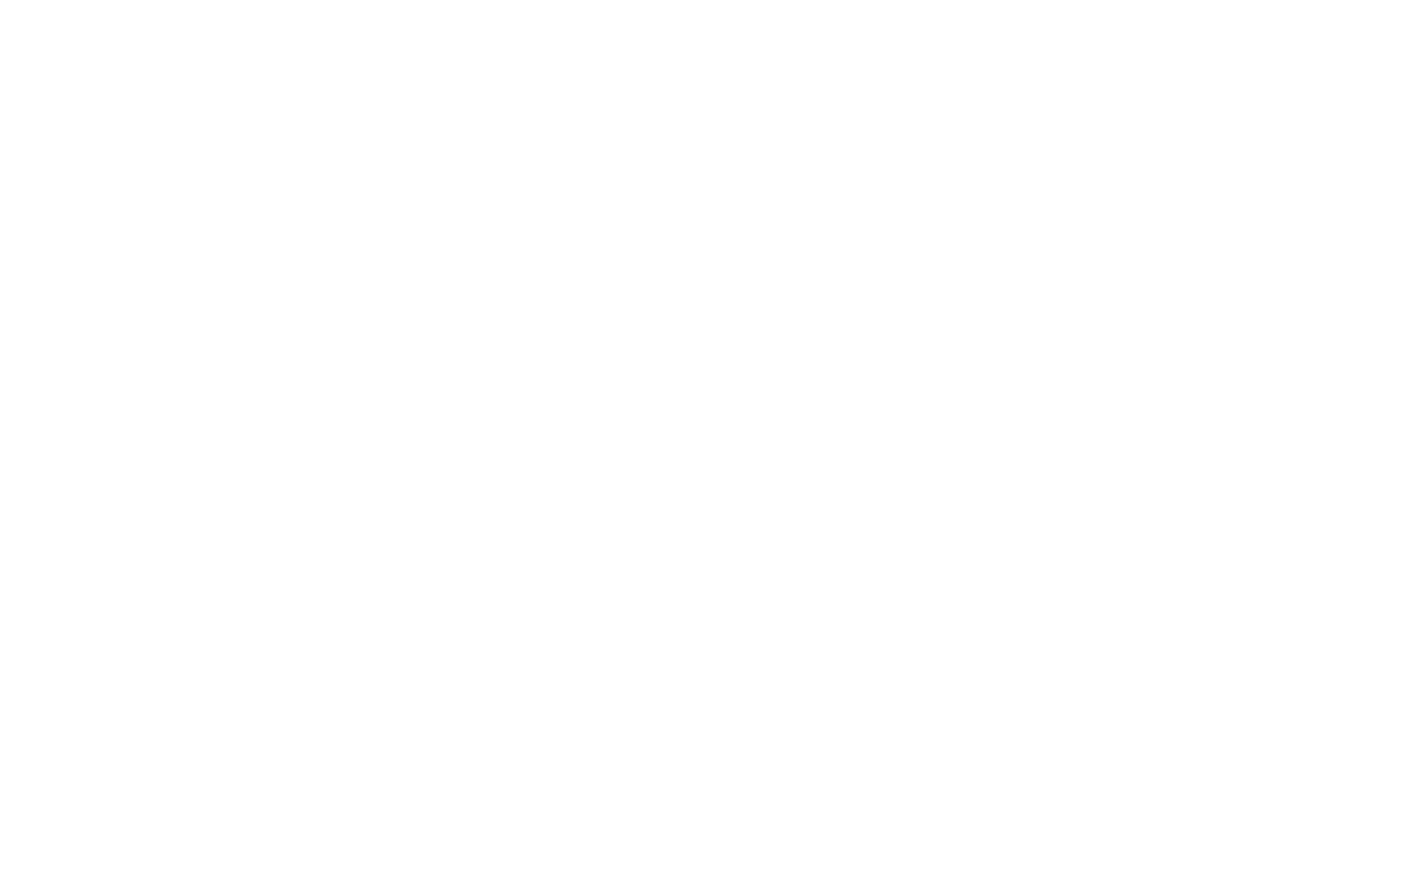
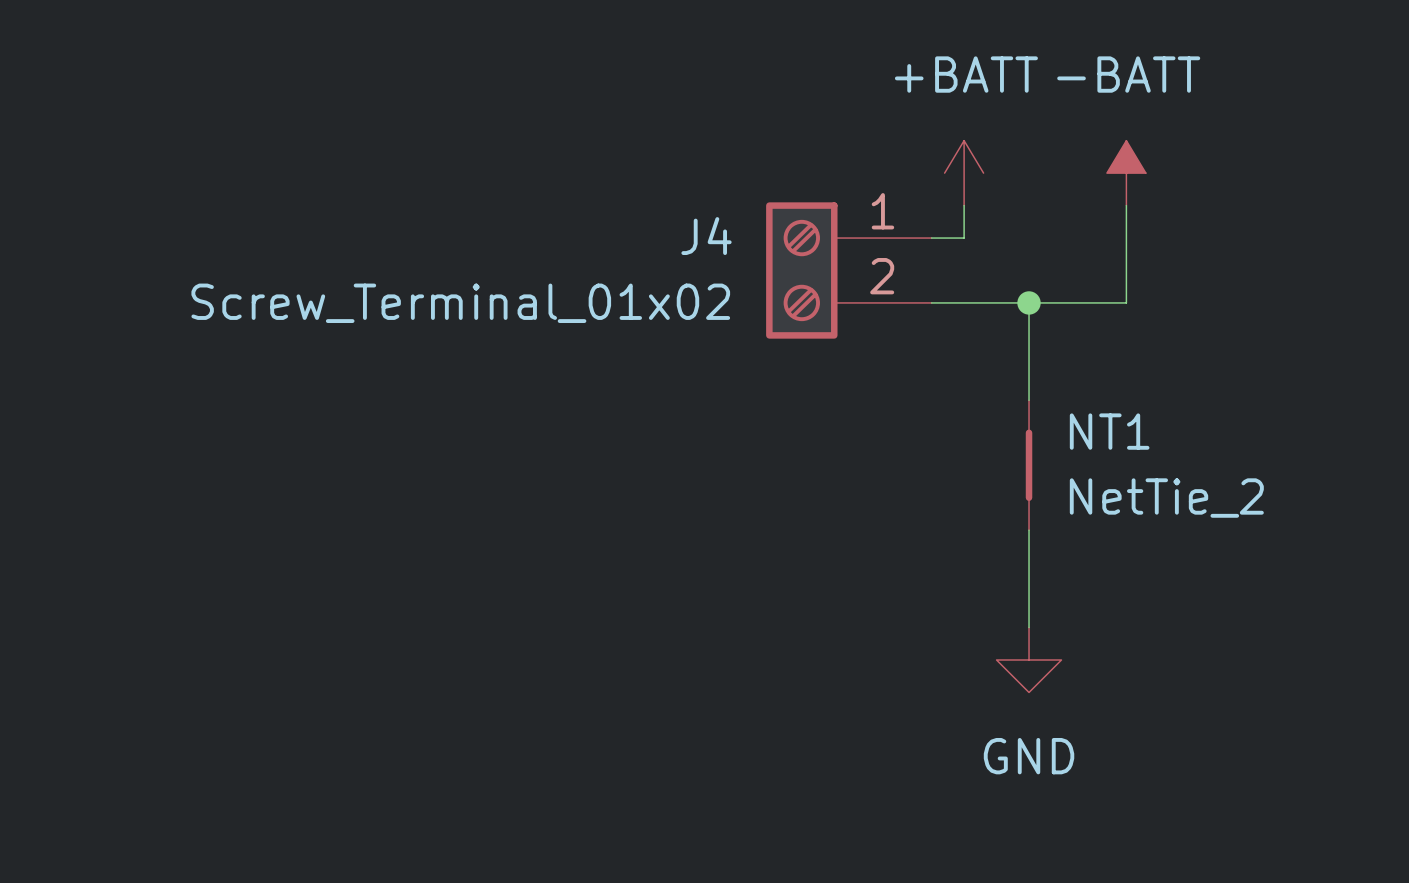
power symbol: none -> +BATT (964, 173)
power symbol: none -> -BATT (1126, 173)
wire: none -> (964, 205) (964, 238) (931, 238)
wire: none -> (1126, 205) (1126, 302) (931, 302)
J4: none -> Screw_Terminal_01x02 (848, 270)
wire: none -> (1029, 302) (1029, 400)
junction: none -> (1029, 302)
NT1: none -> NetTie_2 (1029, 465)
wire: none -> (1029, 530) (1029, 627)
power symbol: none -> GND (1029, 659)

